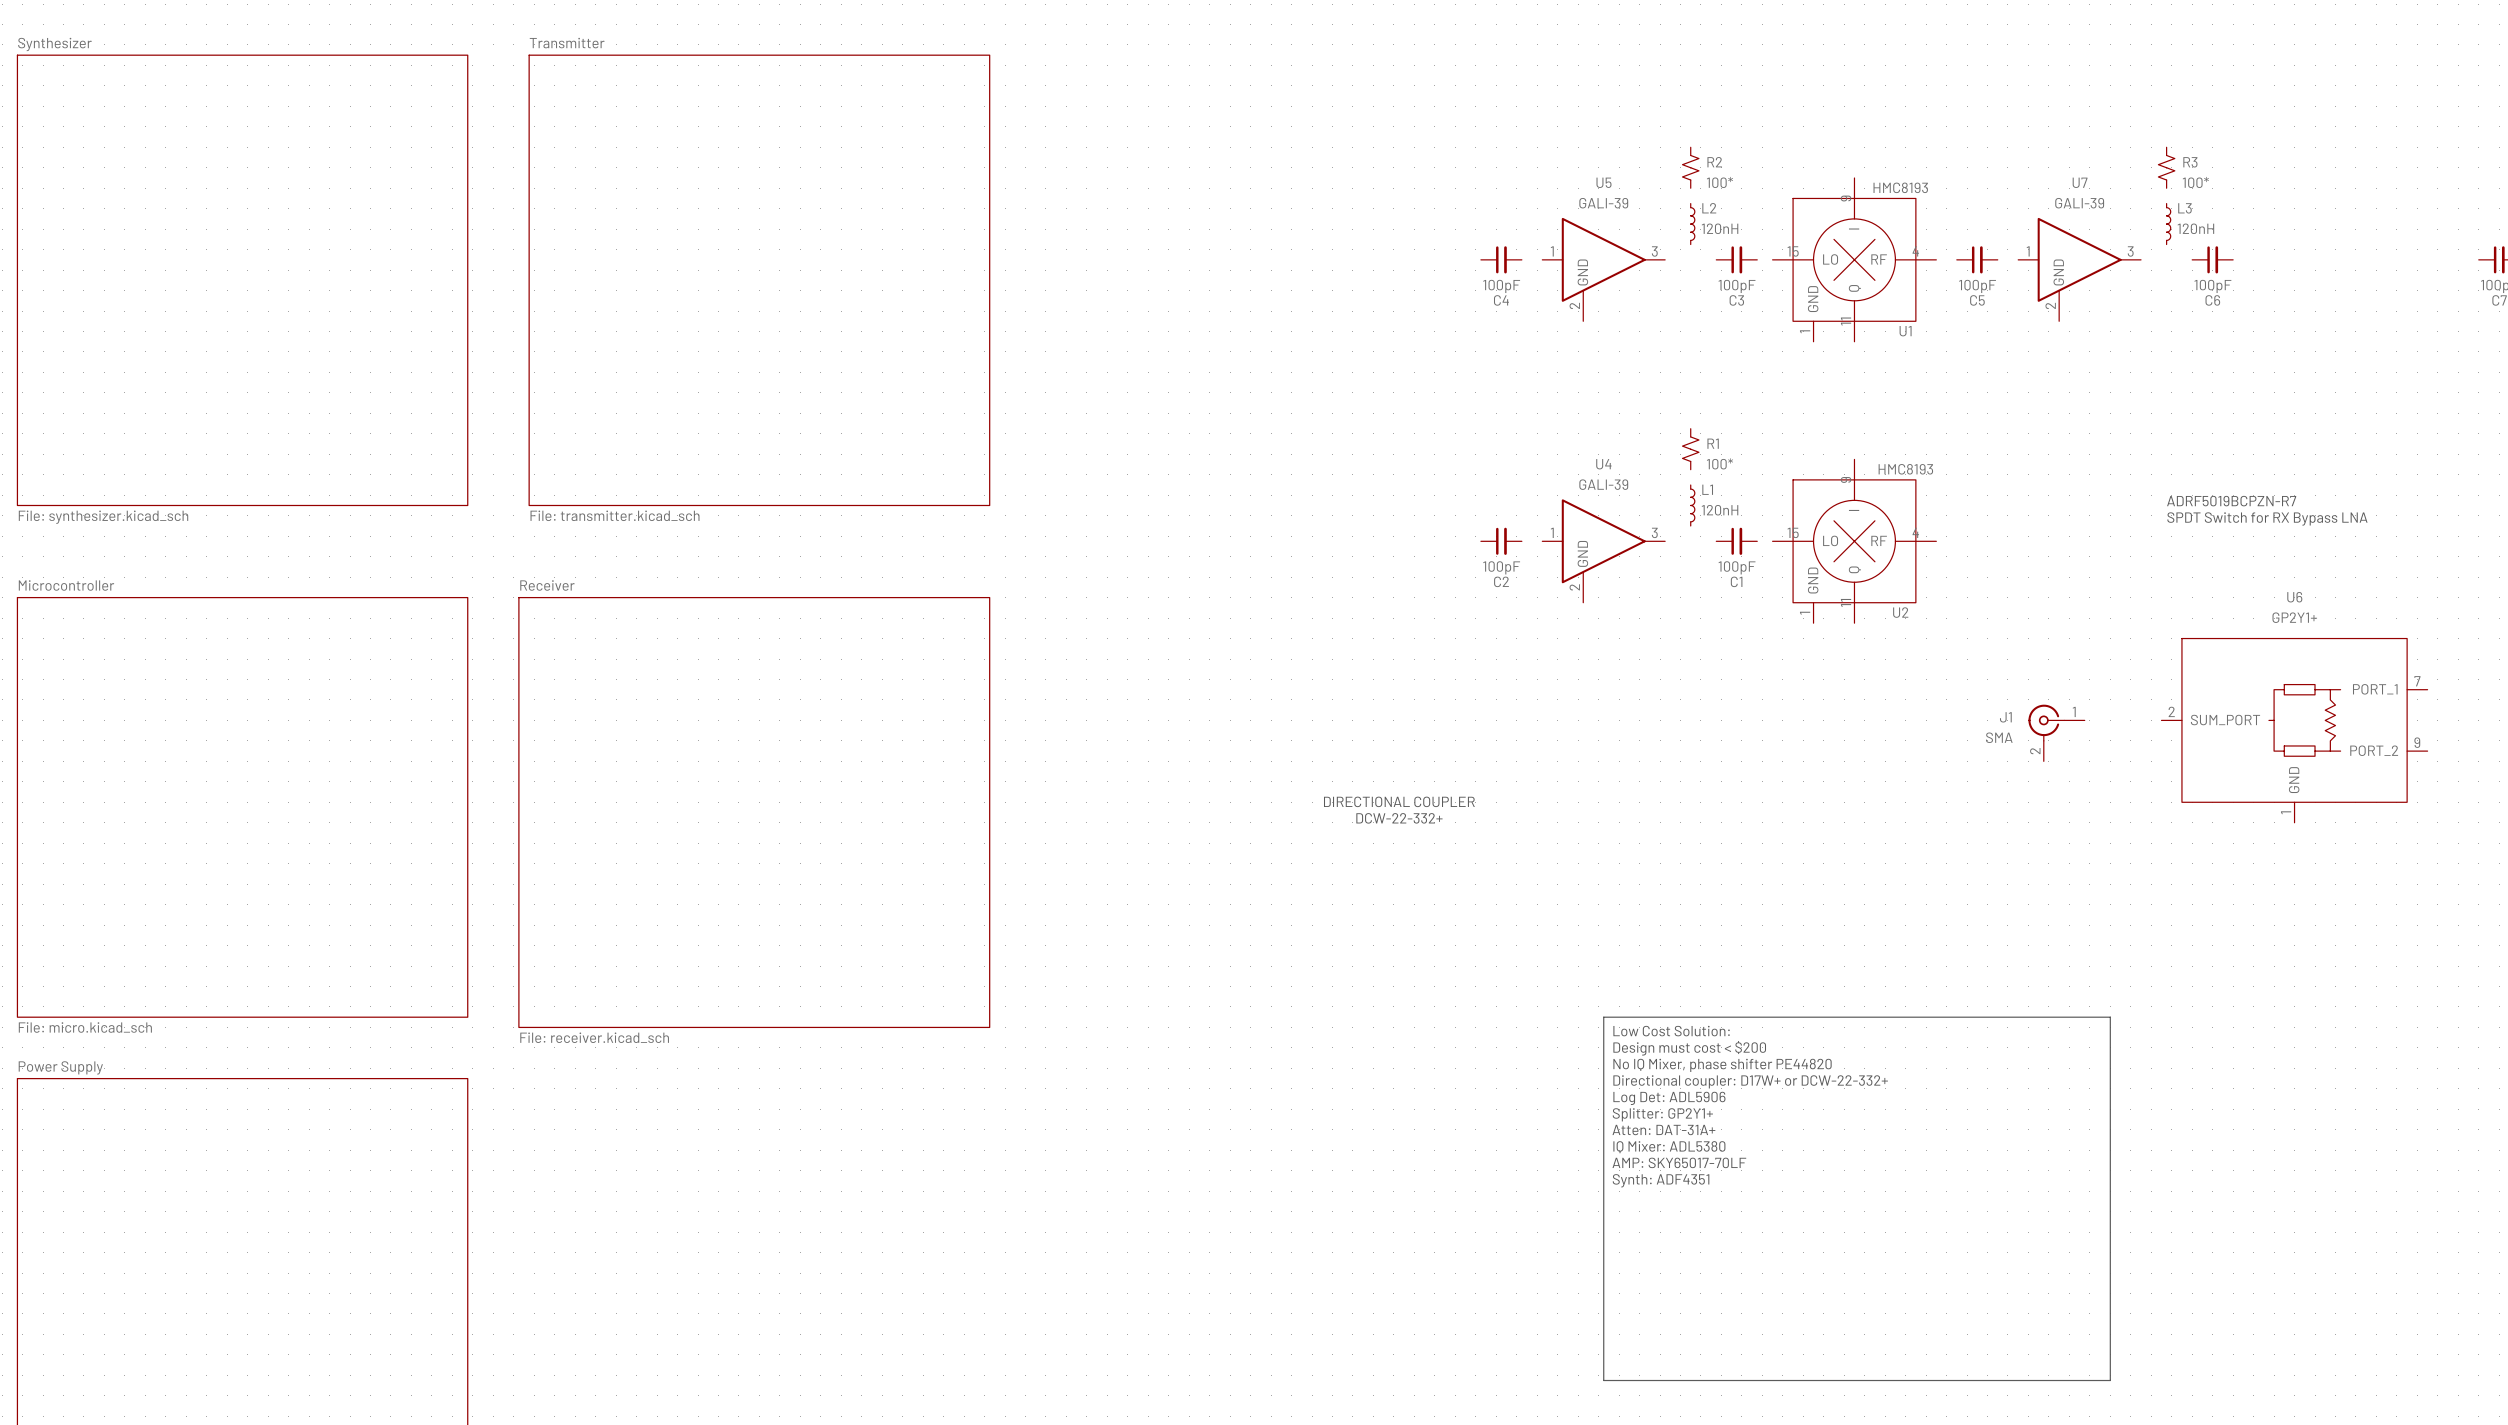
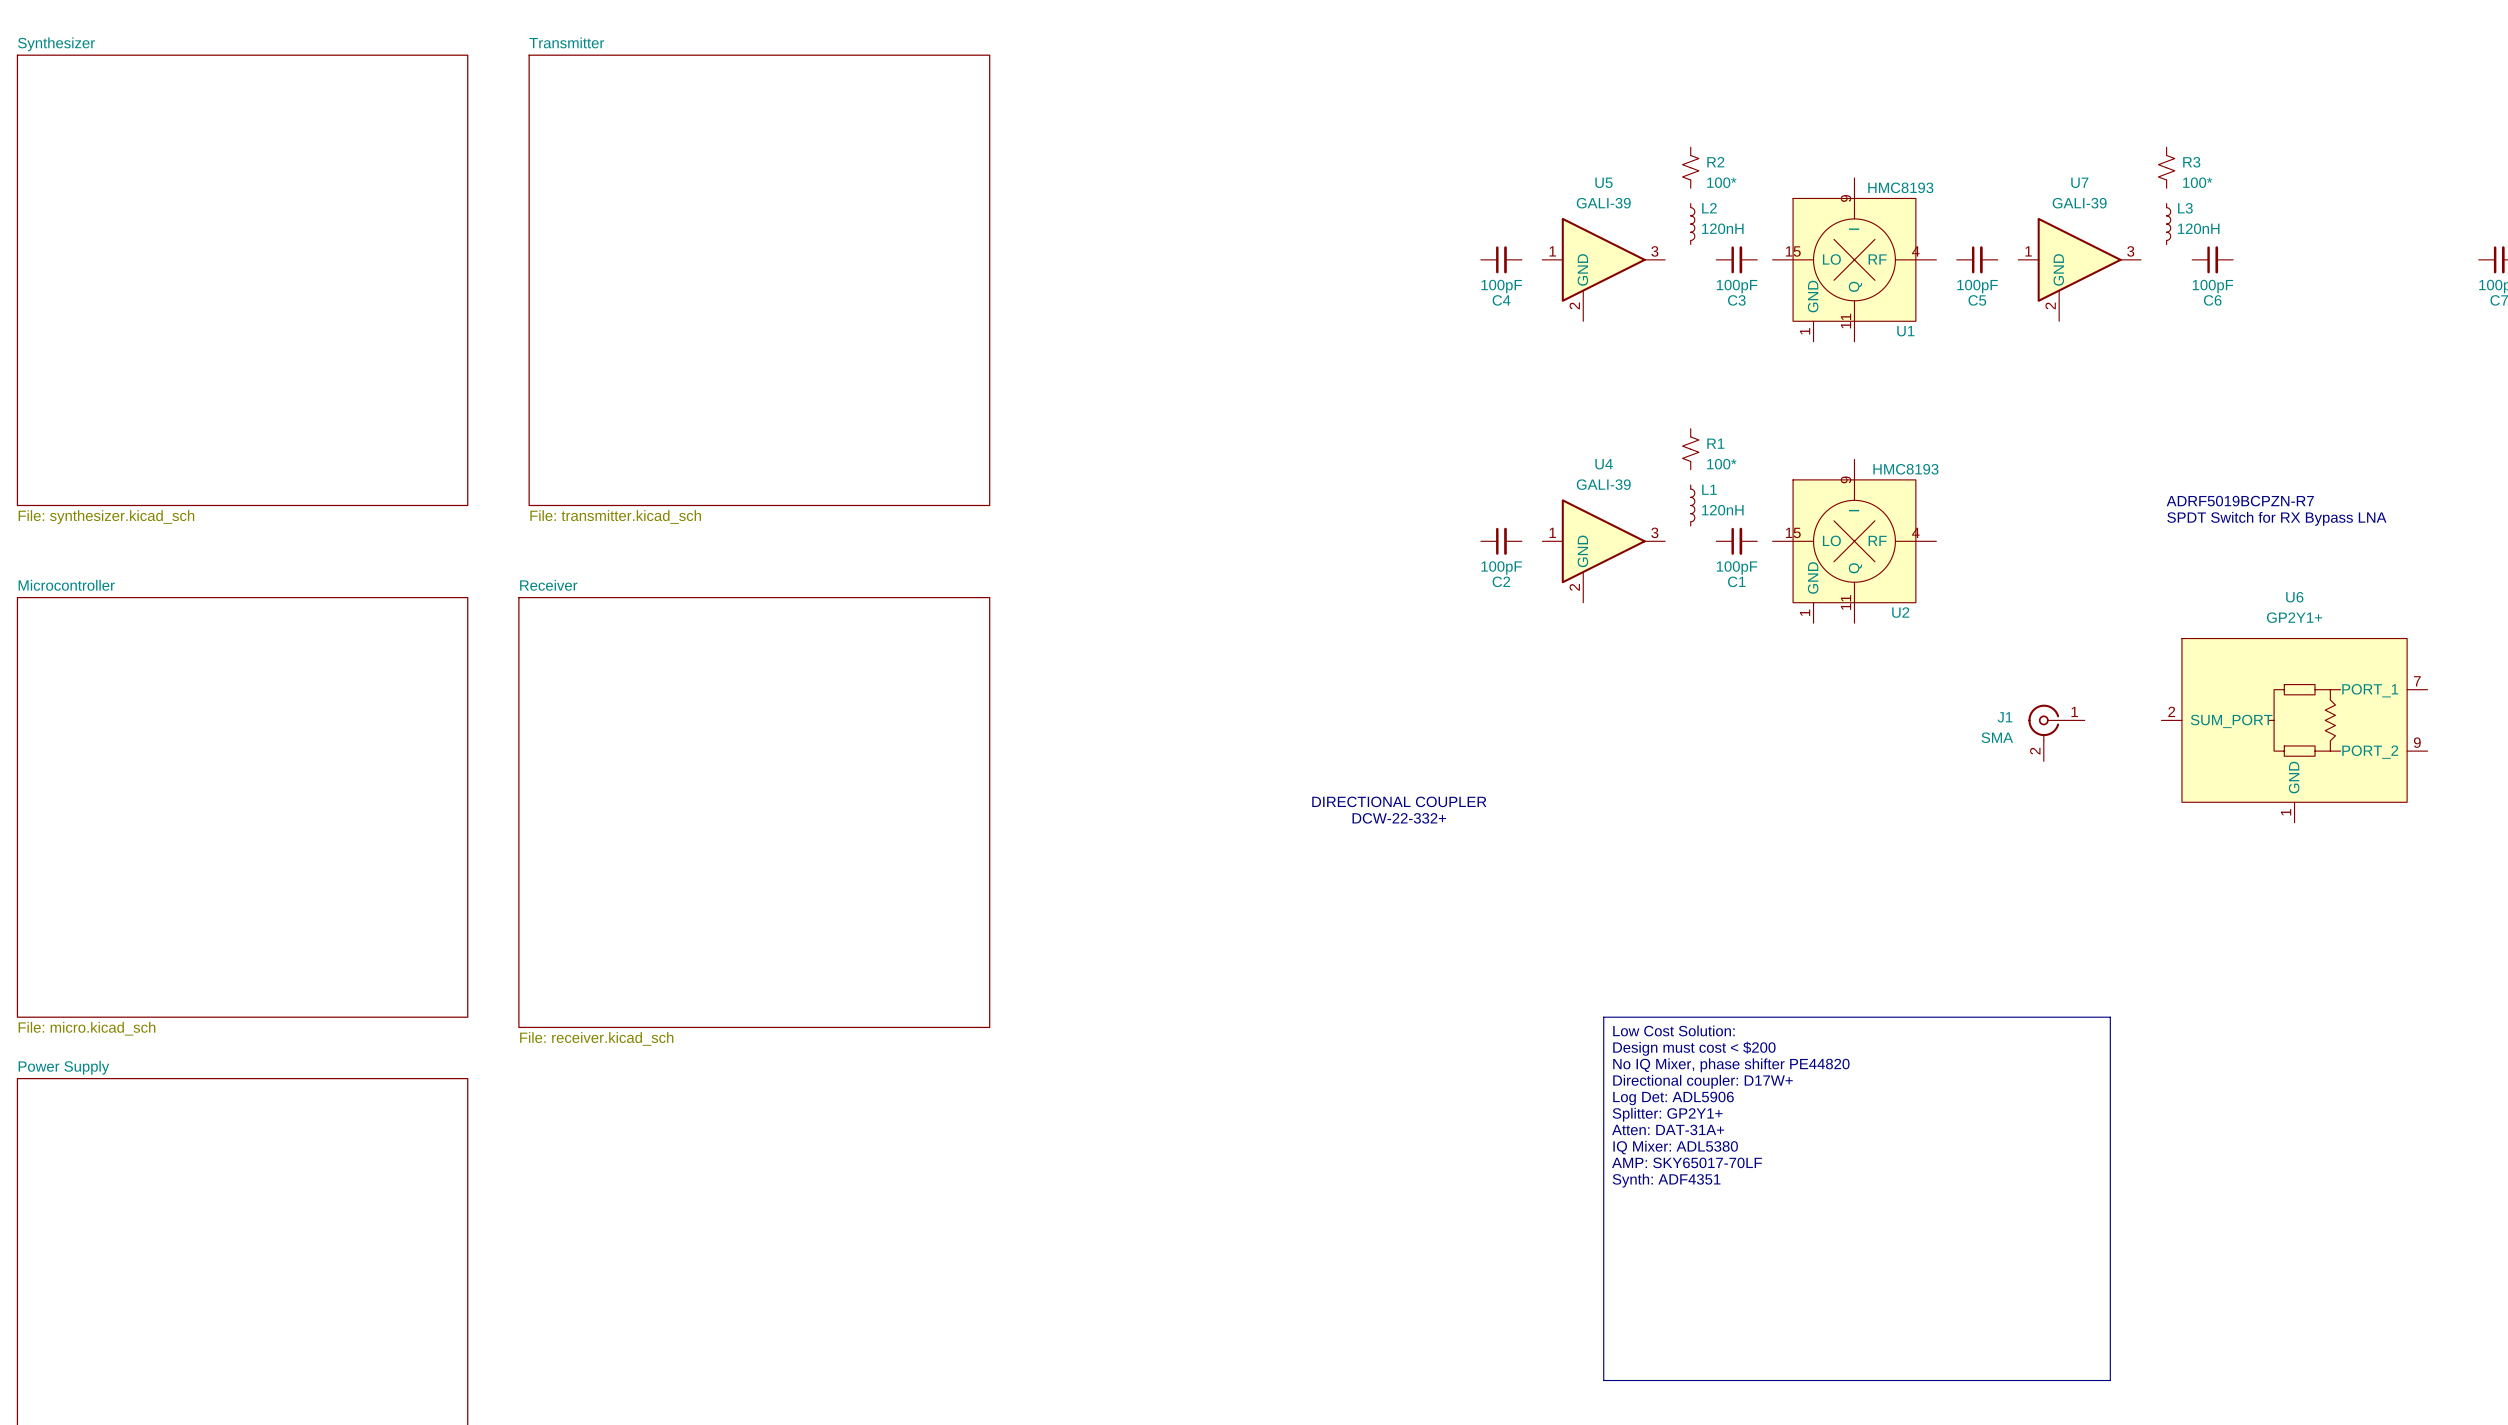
text: Directional coupler: D17W+ or DCW-22-332+ (1750, 1081) -> Directional coupler: D17W+ (1703, 1081)

